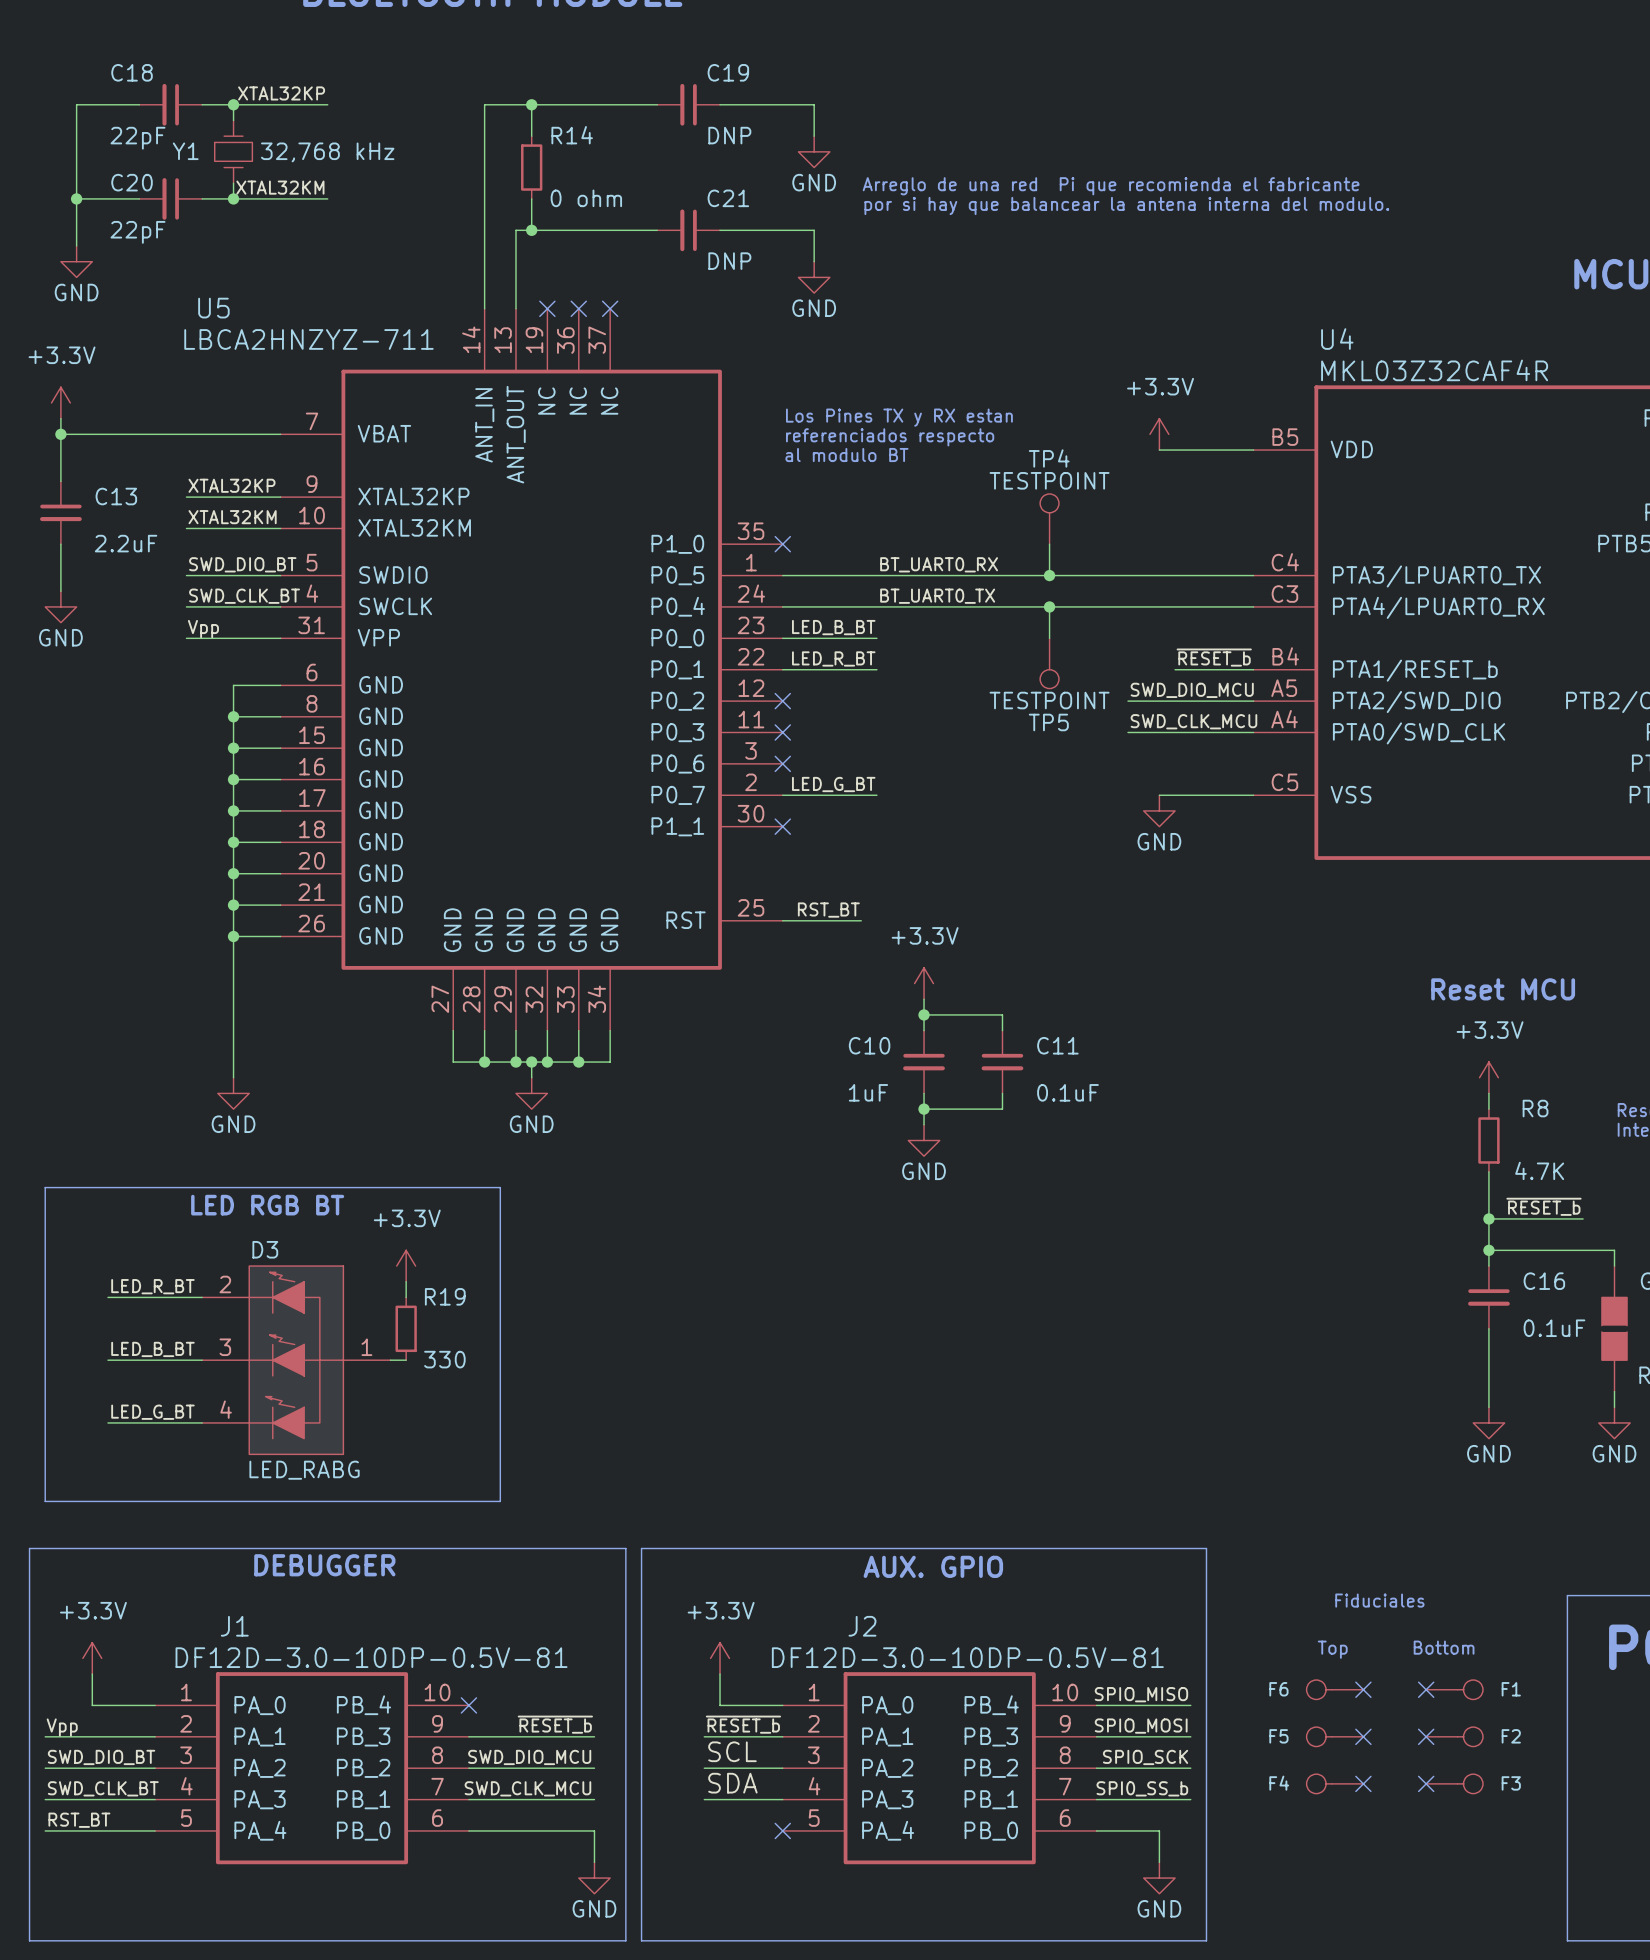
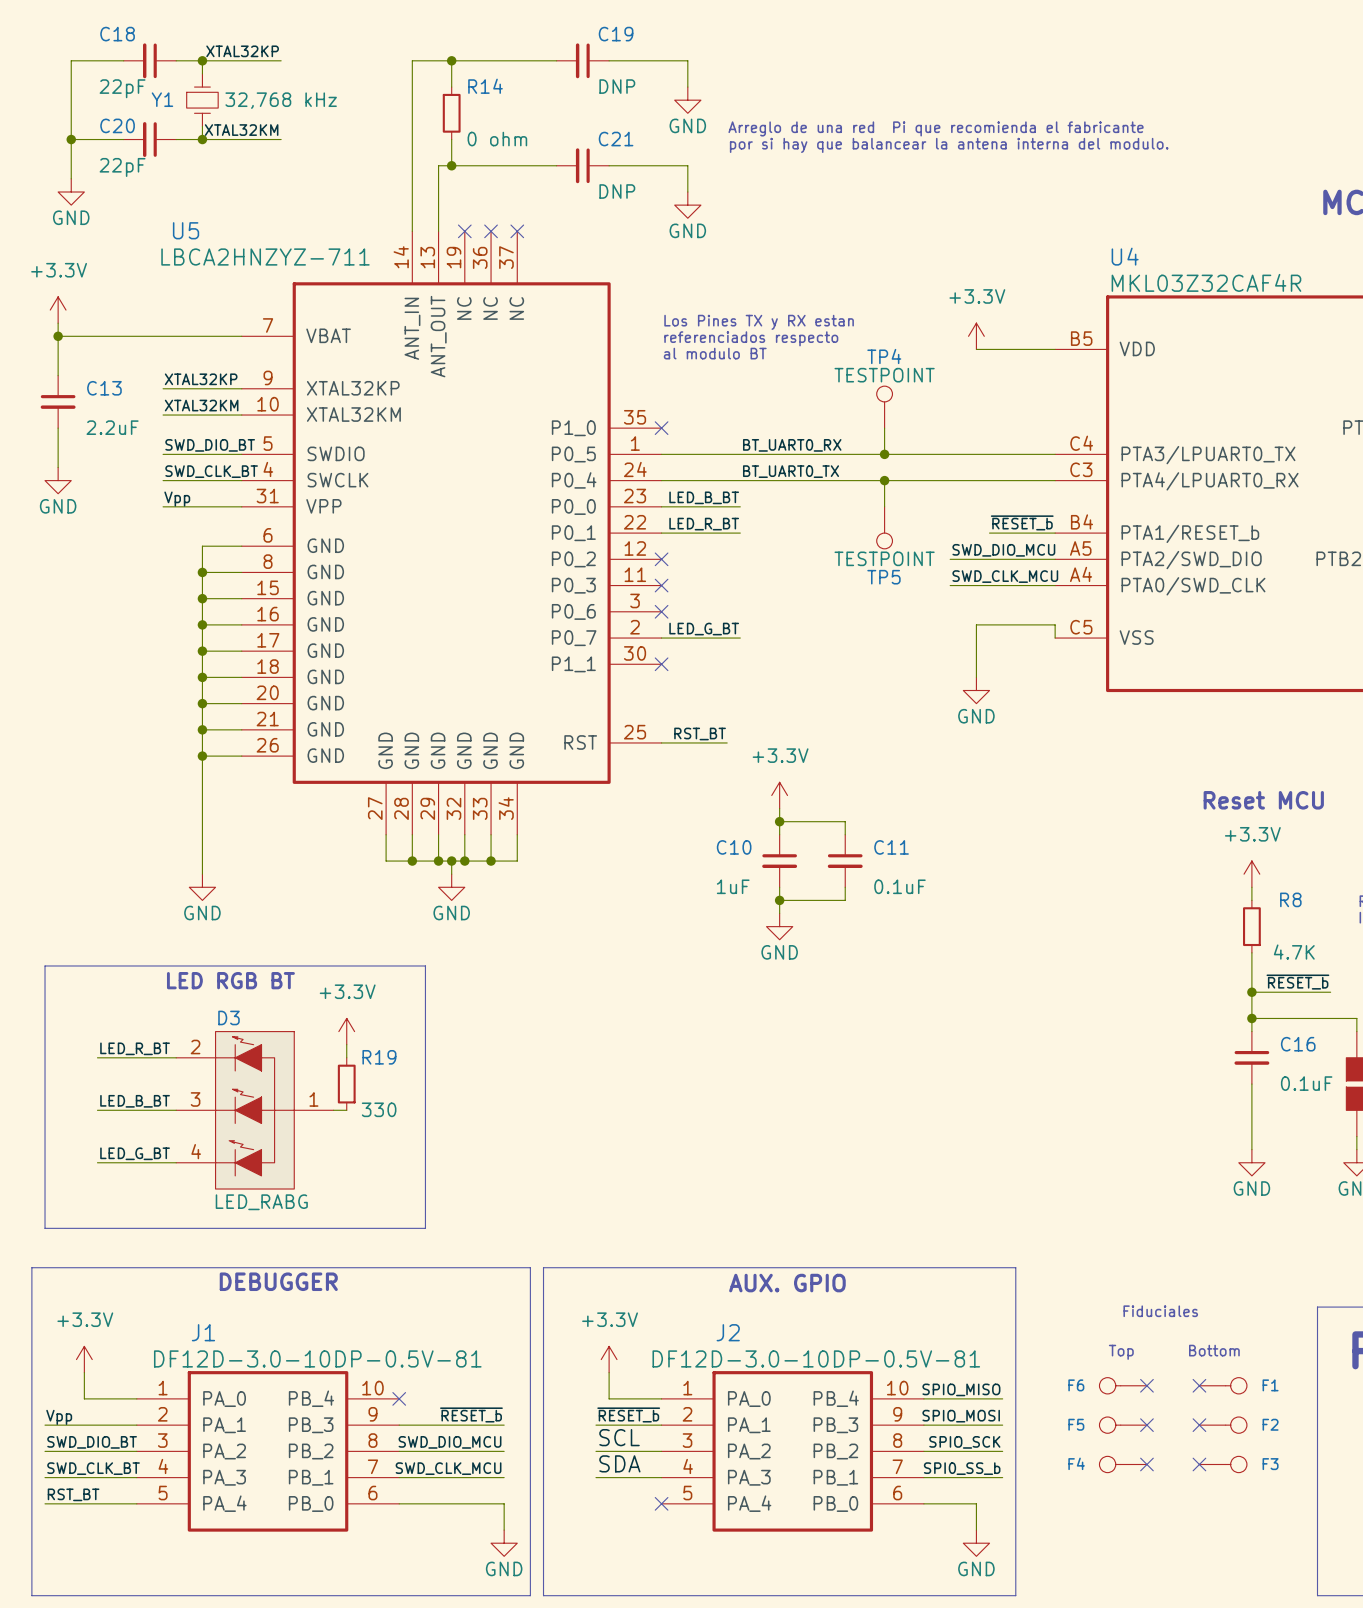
wire: (1159, 795) (1253, 795) -> (976, 677) (976, 624) (1055, 624) (1055, 638)
power symbol position: GND (1159, 810) -> GND (976, 690)

